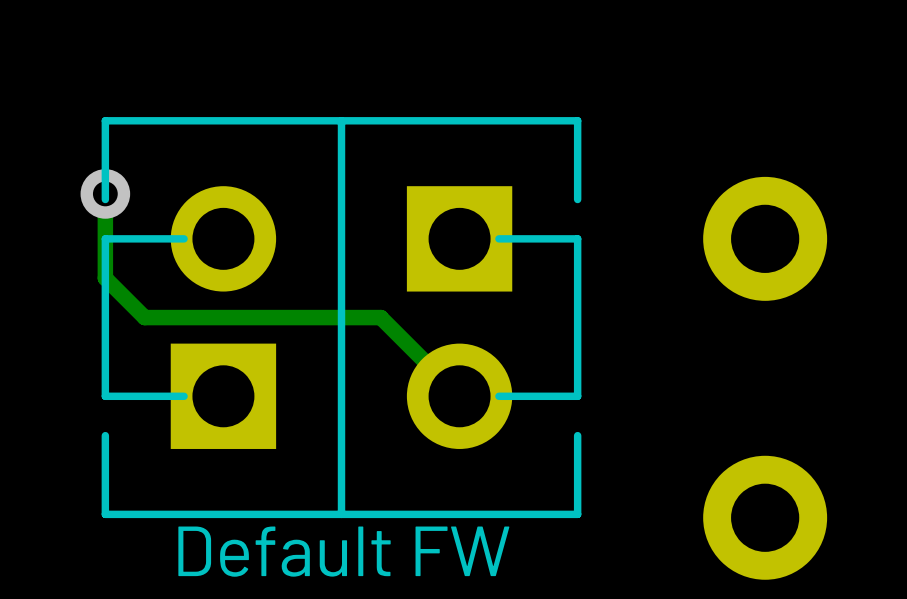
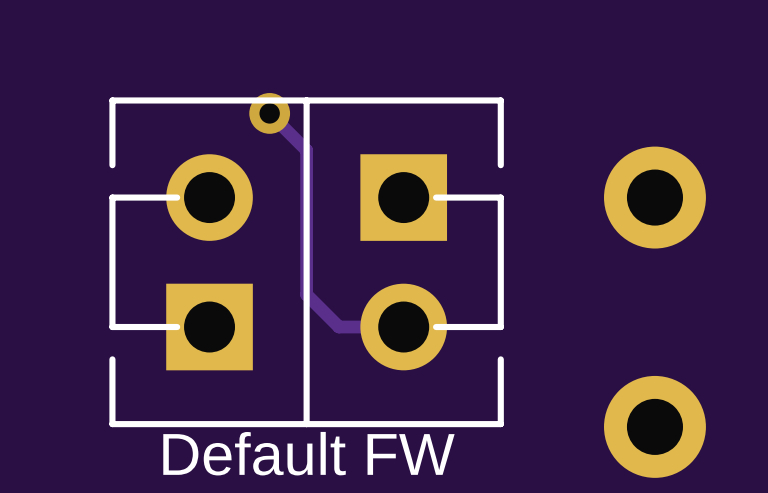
track: (105, 193) (105, 278) (144, 317) (380, 317) (459, 396) -> (269, 113) (306, 150) (306, 294) (338, 327) (403, 327)
via position: (105, 193) -> (269, 113)

